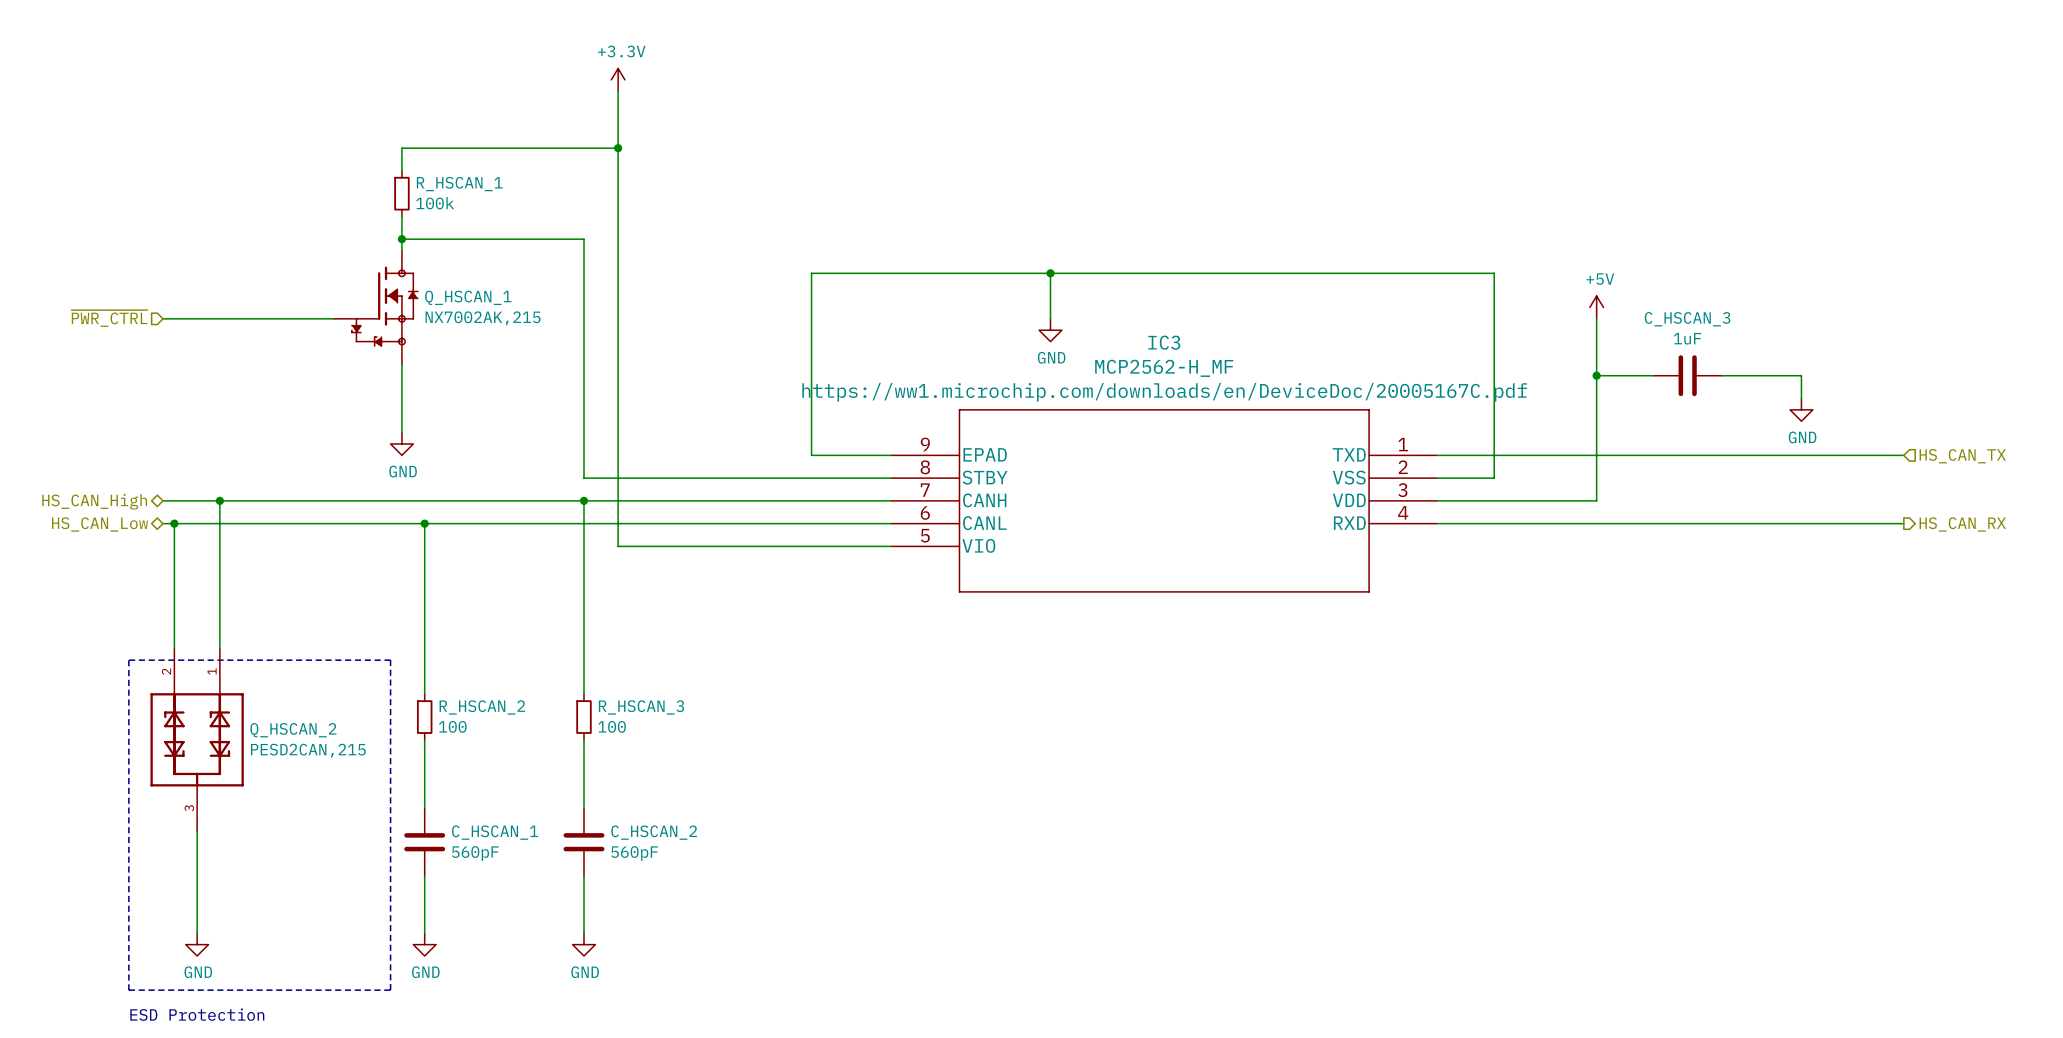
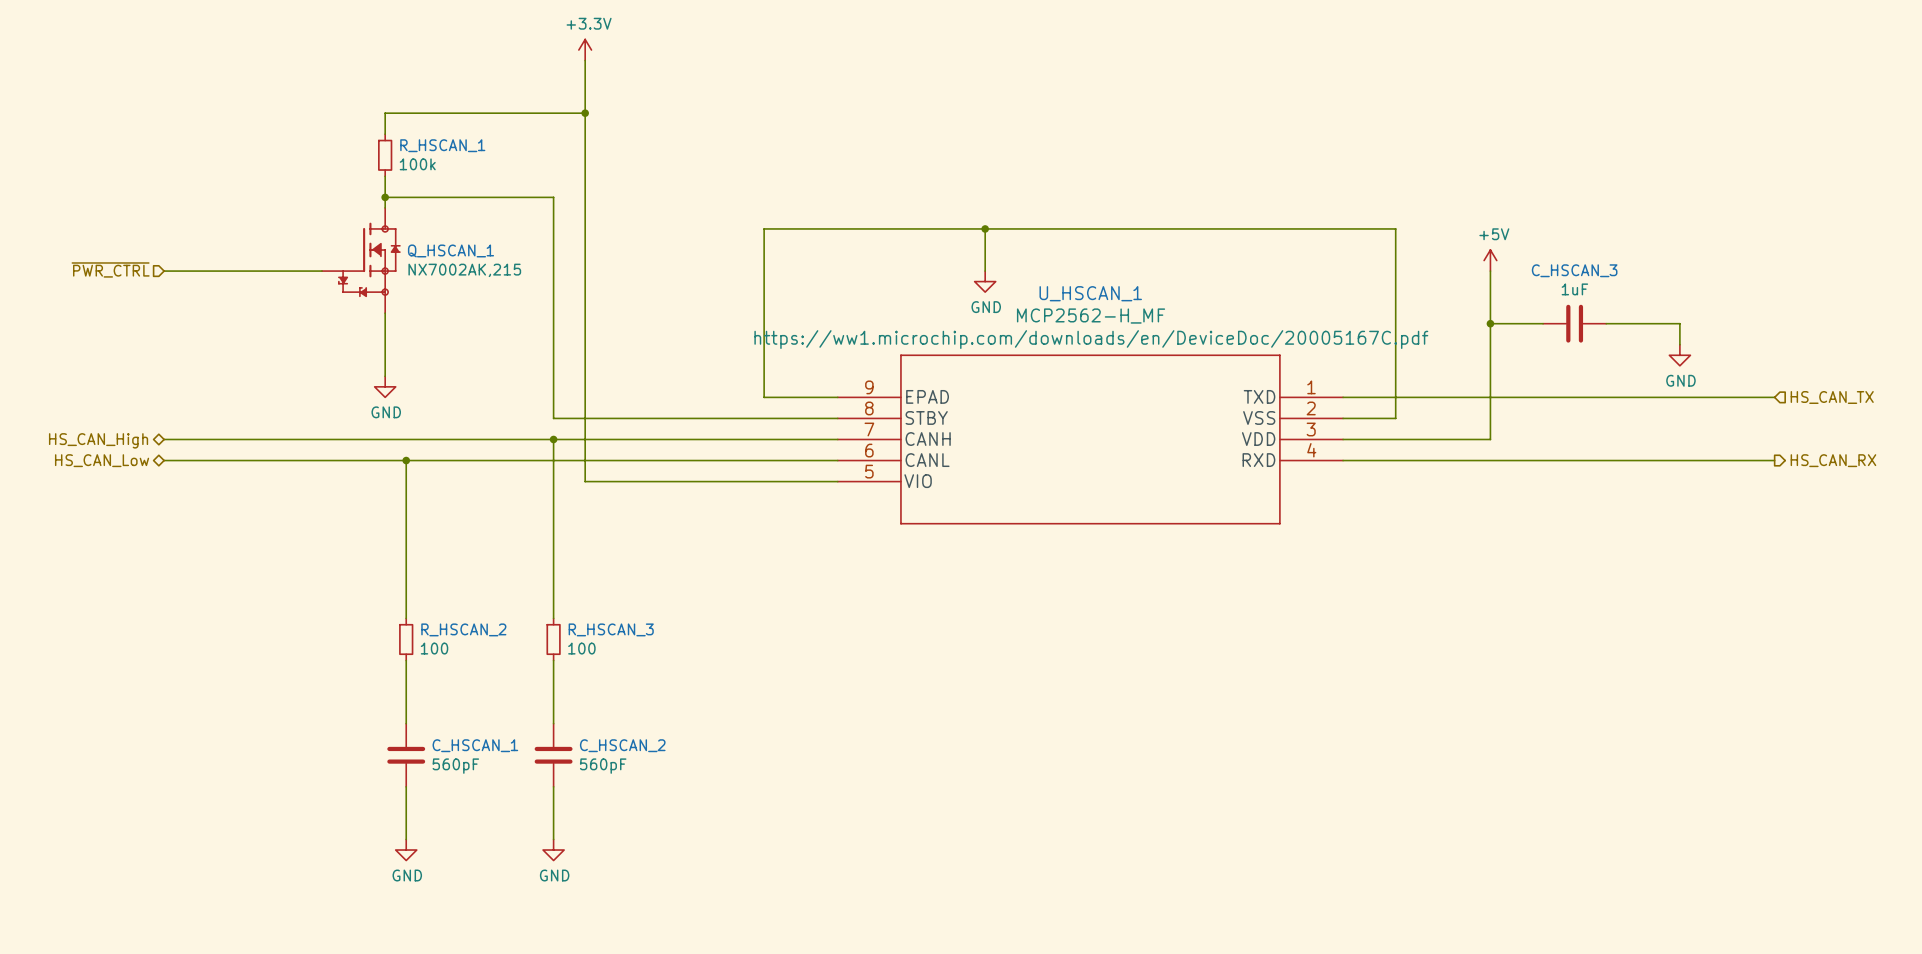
IC3 name: IC3 (1164, 342) -> U_HSCAN_1 (1090, 293)
wire: (219, 500) (219, 648) -> none
junction: (219, 500) -> none
wire: (174, 523) (174, 648) -> none
junction: (174, 523) -> none
line: (128, 660) (390, 660) (390, 990) (128, 990) (128, 660) -> none
Q_HSCAN_2: PESD2CAN,215 (197, 739) -> none
wire: (197, 830) (197, 933) -> none
power symbol: GND (197, 944) -> none
text: ESD Protection (197, 1014) -> none

